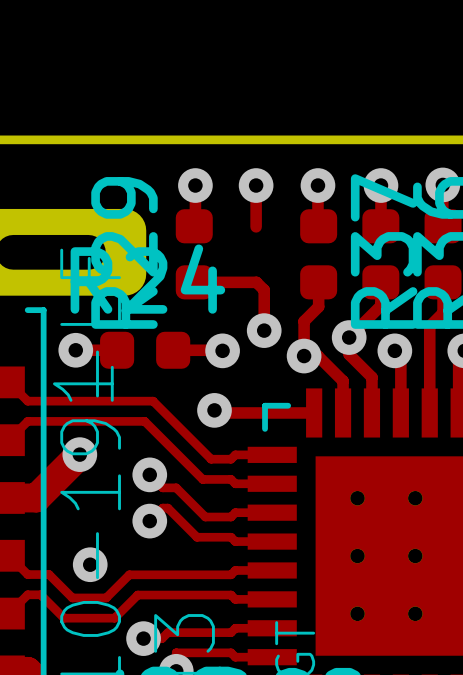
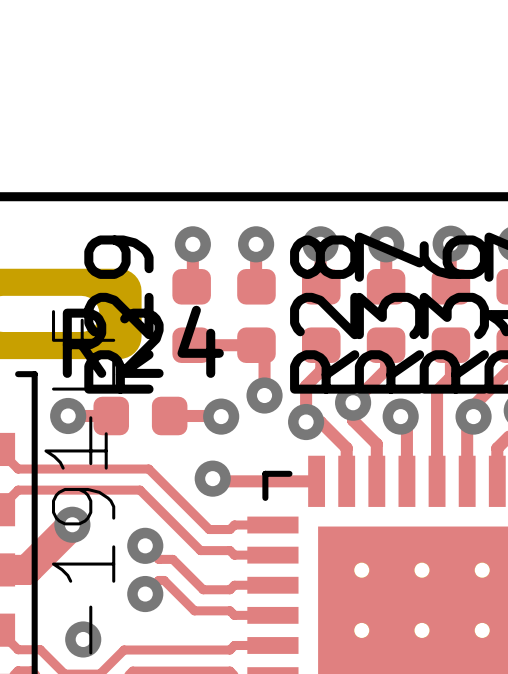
R28: none -> (256, 316)

